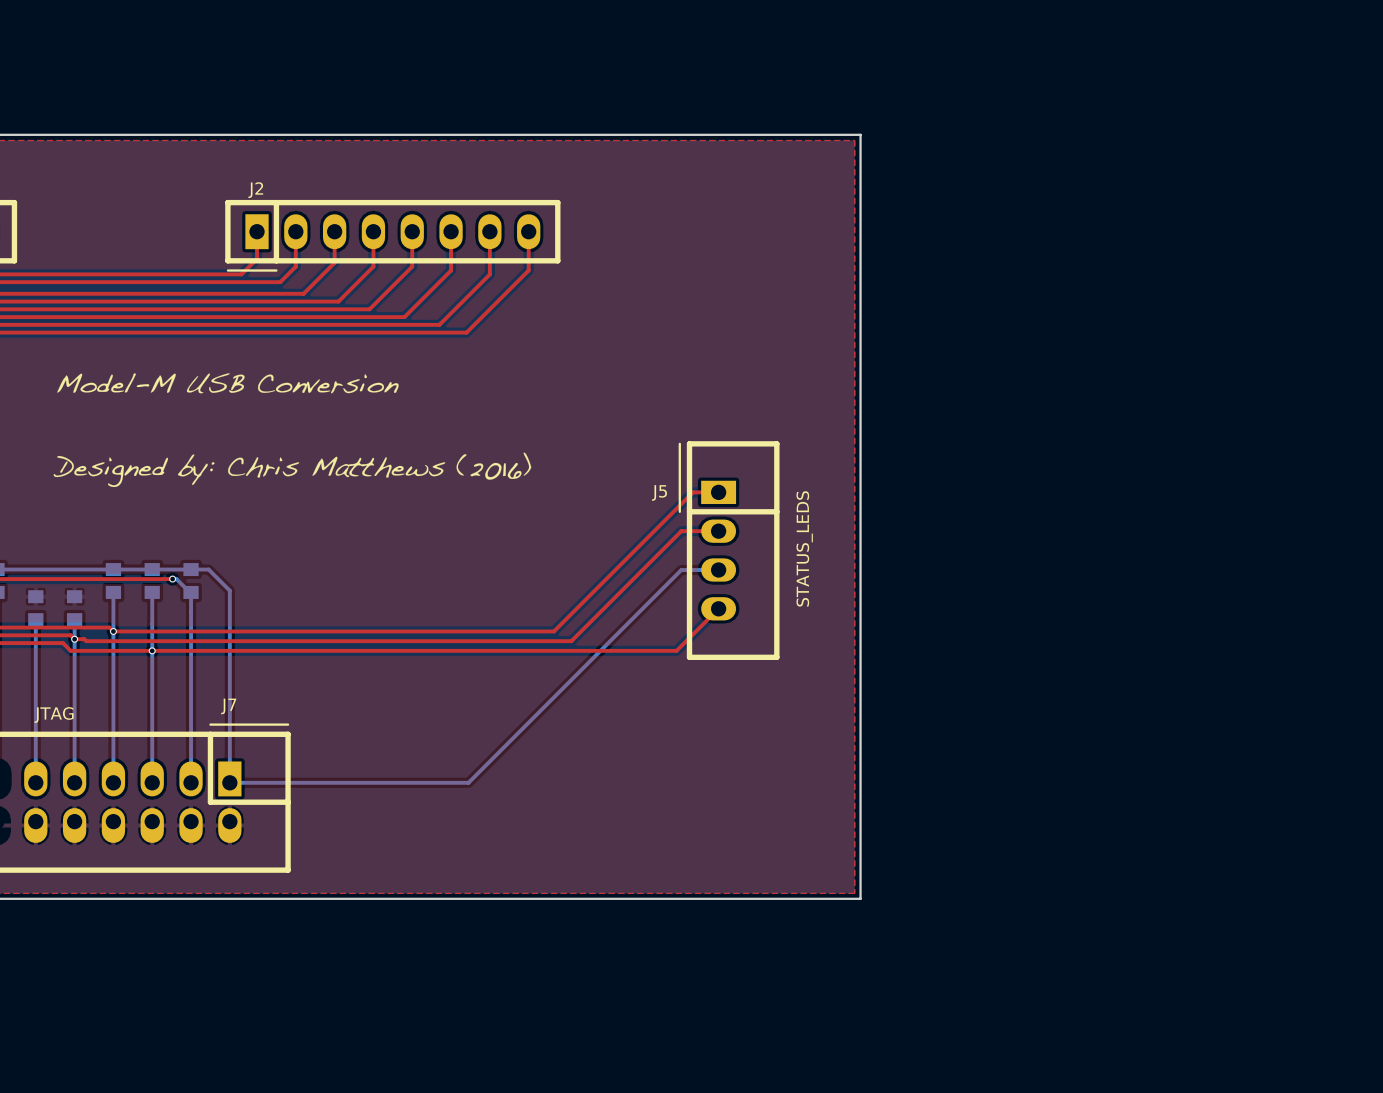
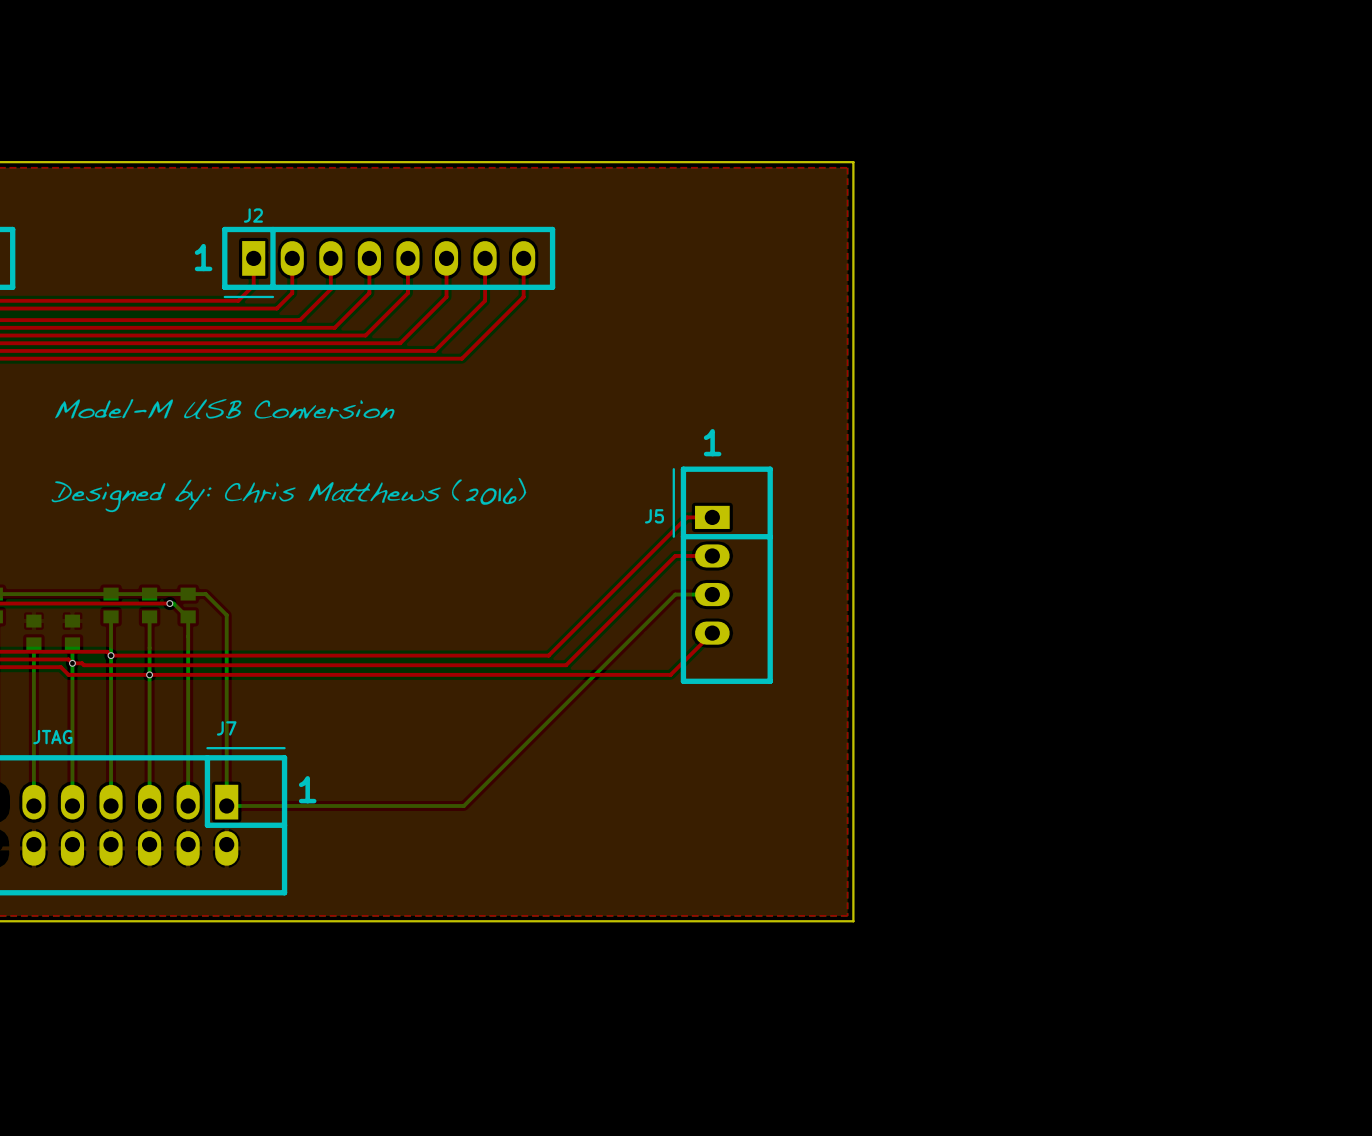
text: none -> 1 (203, 257)
text: none -> 1 (712, 442)
J5 value: STATUS_LEDS (804, 548) -> none
text: none -> 1 (307, 789)

